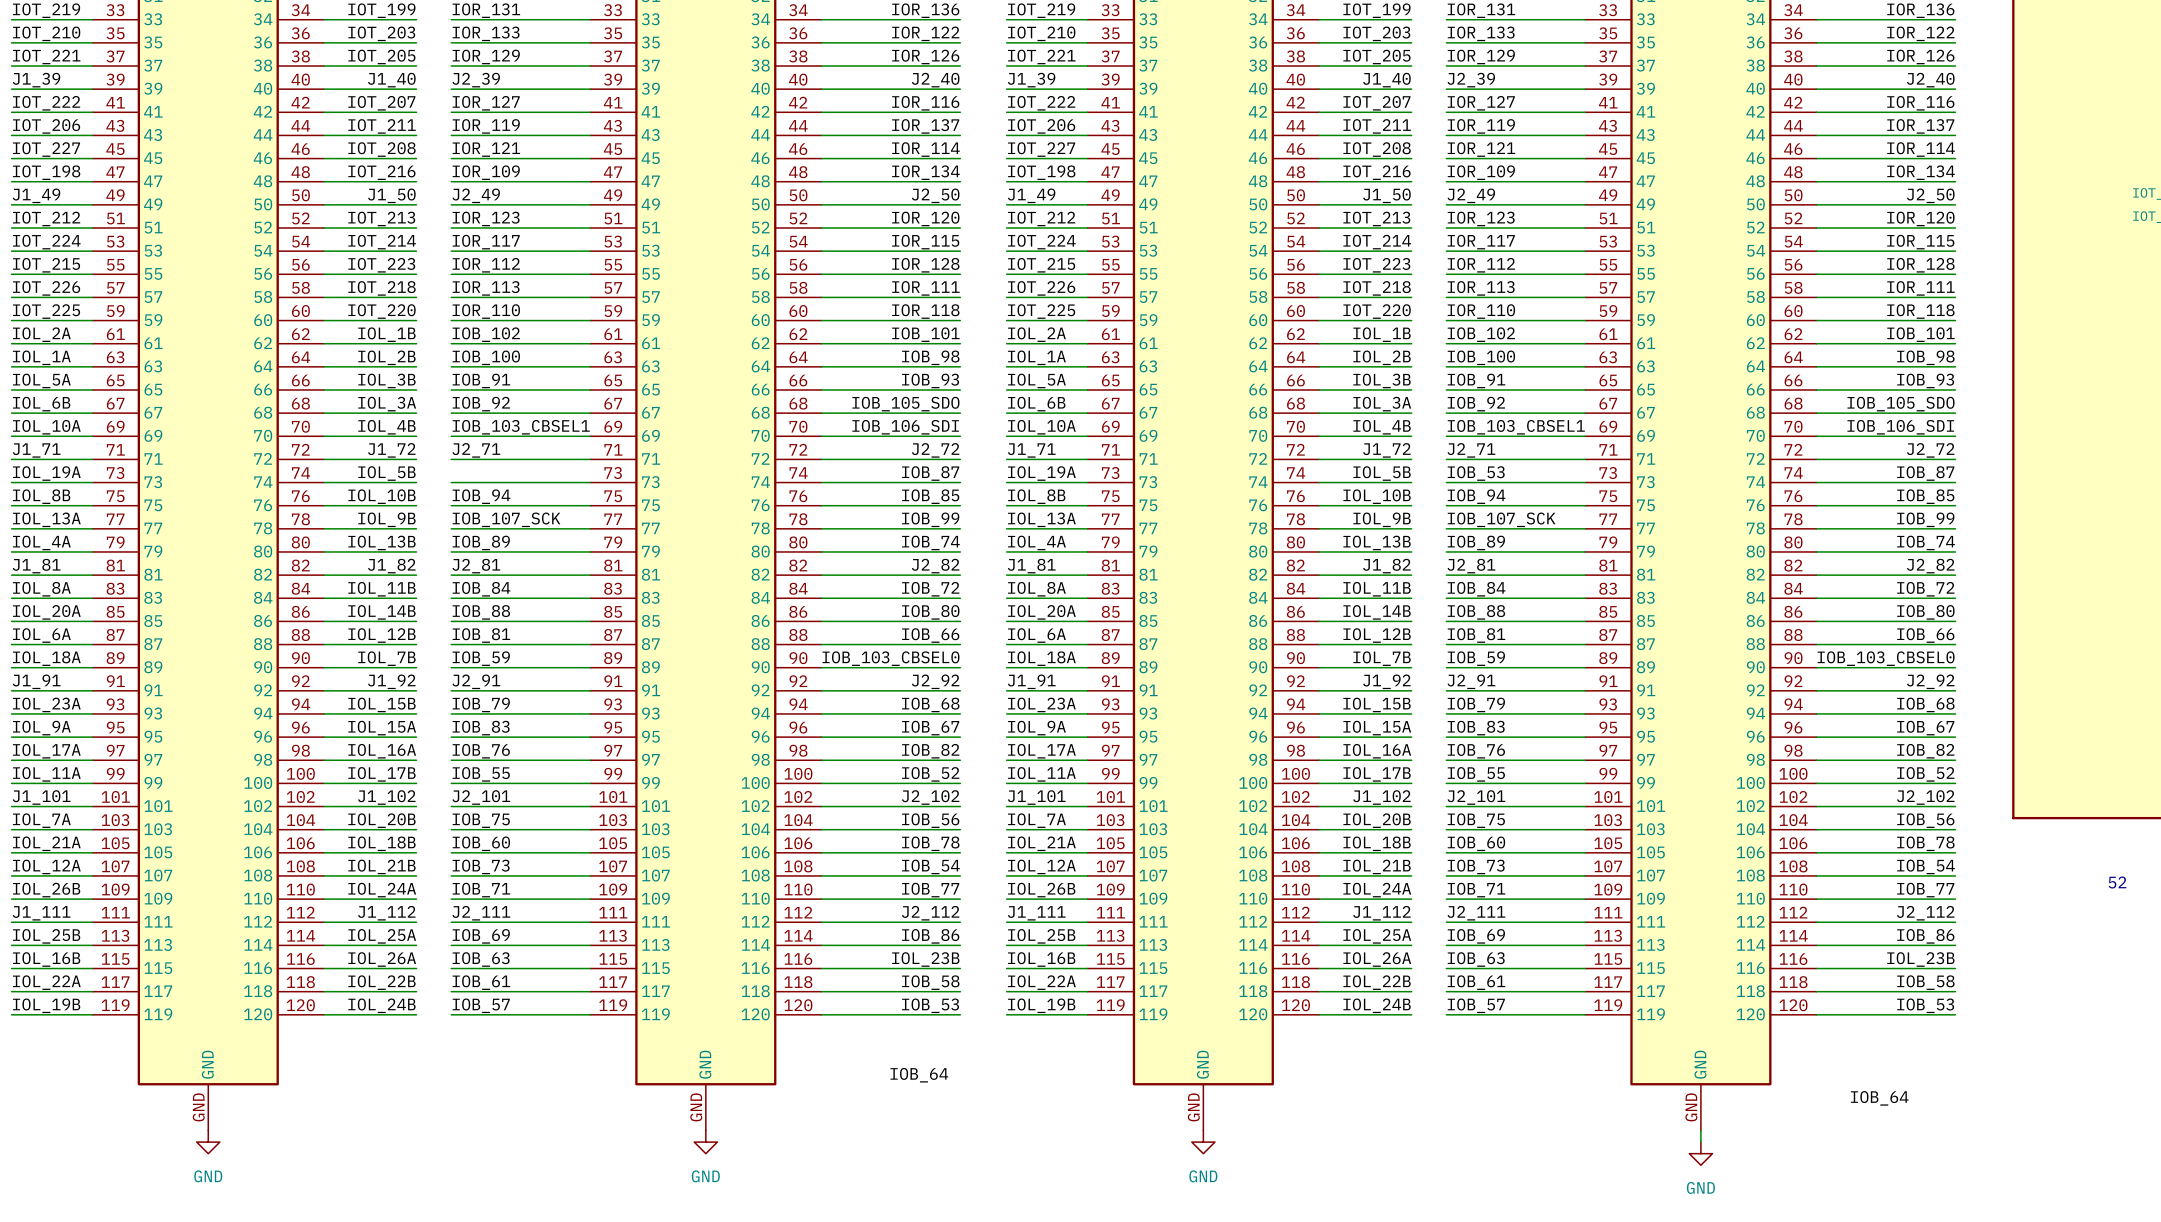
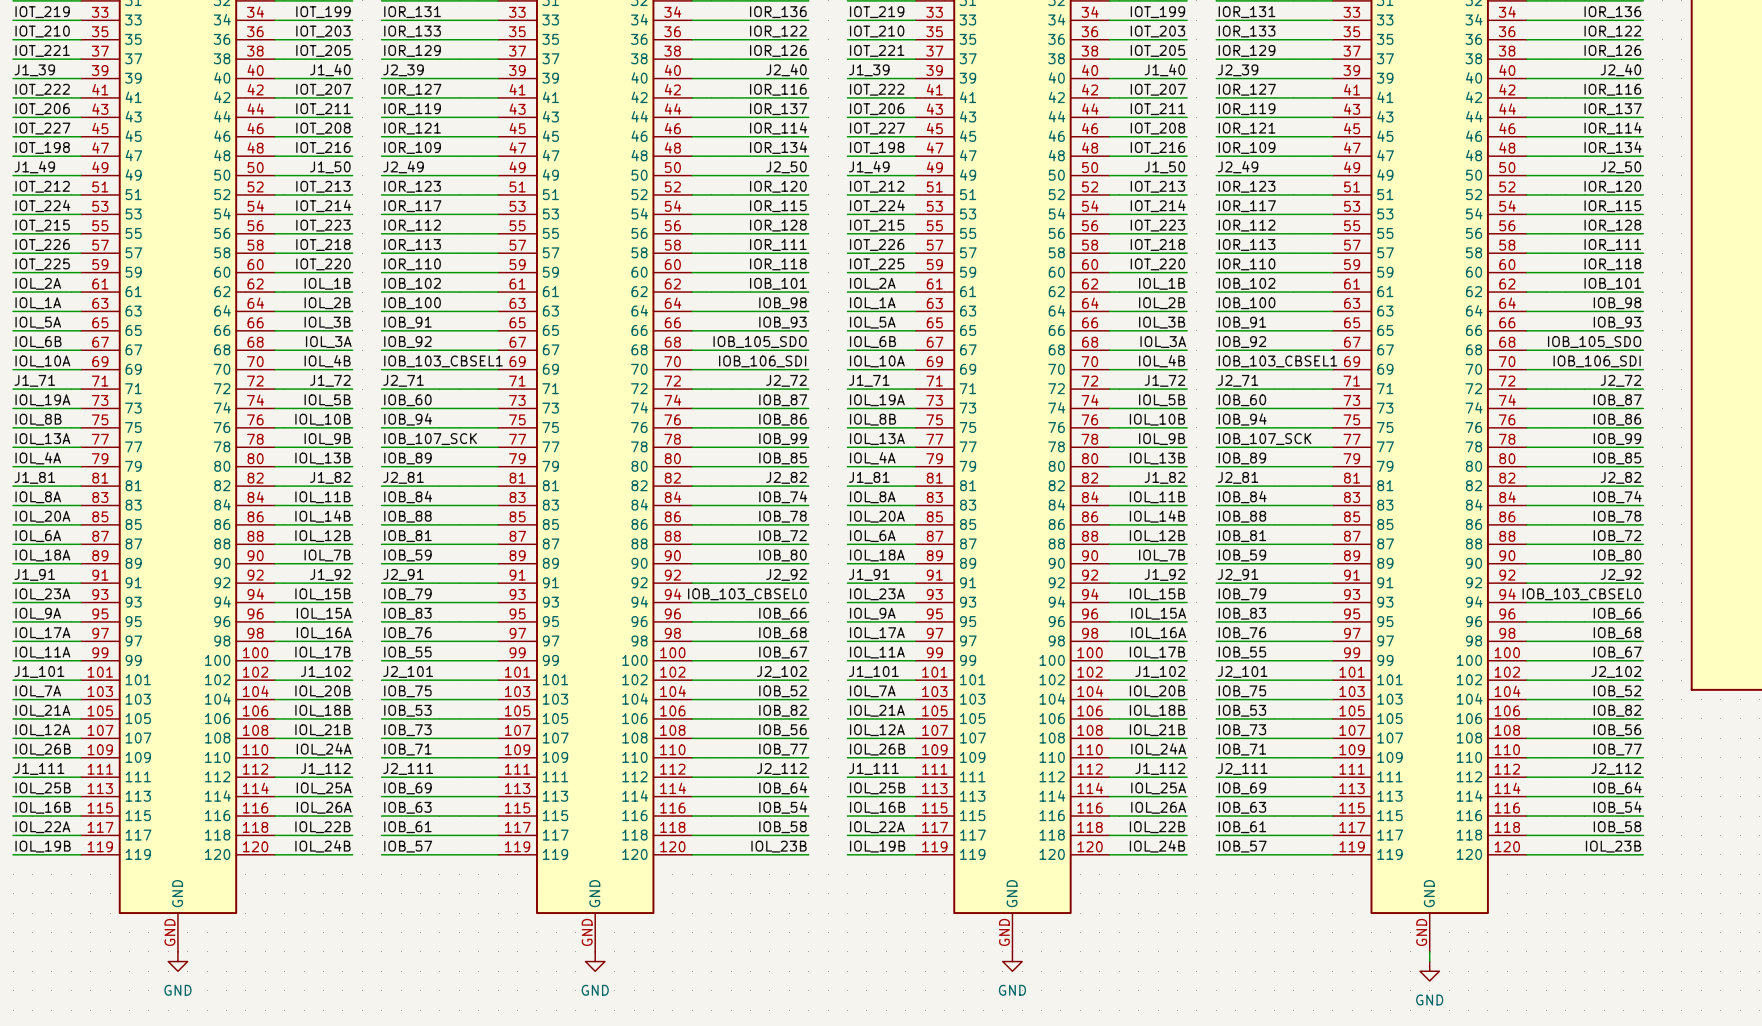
label: none -> IOB_60 (407, 400)
label: IOB_53 (1476, 473) -> IOB_60 (1242, 400)
label: IOB_85 (930, 496) -> IOB_86 (782, 419)
label: IOB_85 (1925, 496) -> IOB_86 (1617, 419)
label: IOB_74 (930, 542) -> IOB_85 (782, 458)
label: IOB_74 (1926, 542) -> IOB_85 (1617, 458)
label: IOB_72 (930, 589) -> IOB_74 (783, 497)
label: IOB_72 (1925, 589) -> IOB_74 (1617, 497)
label: IOB_80 (930, 612) -> IOB_78 (782, 516)
label: IOB_80 (1925, 612) -> IOB_78 (1617, 516)
label: IOB_66 (930, 635) -> IOB_72 (782, 536)
label: IOB_66 (1925, 635) -> IOB_72 (1617, 536)
label: IOB_103_CBSEL0 (890, 658) -> IOB_80 (782, 555)
label: IOB_103_CBSEL0 (1886, 658) -> IOB_80 (1617, 555)
label: IOB_68 (930, 704) -> IOB_103_CBSEL0 (747, 594)
label: IOB_68 (1925, 704) -> IOB_103_CBSEL0 (1581, 594)
label: IOB_67 (930, 728) -> IOB_66 (782, 613)
label: IOB_67 (1925, 728) -> IOB_66 (1617, 613)
label: IOB_82 (930, 751) -> IOB_68 (782, 633)
label: IOB_82 (1925, 751) -> IOB_68 (1617, 633)
label: IOB_52 (930, 774) -> IOB_67 (783, 652)
label: IOB_52 (1925, 774) -> IOB_67 (1617, 652)
label: IOB_56 (930, 820) -> IOB_52 (782, 691)
label: IOB_56 (1925, 820) -> IOB_52 (1617, 691)
label: IOB_60 (481, 843) -> IOB_53 (407, 710)
label: IOB_78 (930, 843) -> IOB_82 (782, 710)
label: IOB_60 (1476, 843) -> IOB_53 (1242, 710)
label: IOB_78 (1925, 843) -> IOB_82 (1617, 710)
label: IOB_54 (930, 866) -> IOB_56 (782, 730)
label: IOB_54 (1926, 866) -> IOB_56 (1617, 730)
label: IOB_86 (930, 936) -> IOB_64 (783, 788)
label: IOB_86 (1925, 936) -> IOB_64 (1617, 788)
label: IOL_23B (925, 959) -> IOB_54 (783, 807)
label: IOL_23B (1920, 959) -> IOB_54 (1617, 807)
label: IOB_53 (930, 1005) -> IOL_23B (779, 846)
label: IOB_53 (1925, 1005) -> IOL_23B (1613, 846)
label: IOB_64 (919, 1075) -> none
label: IOB_64 (1879, 1098) -> none

